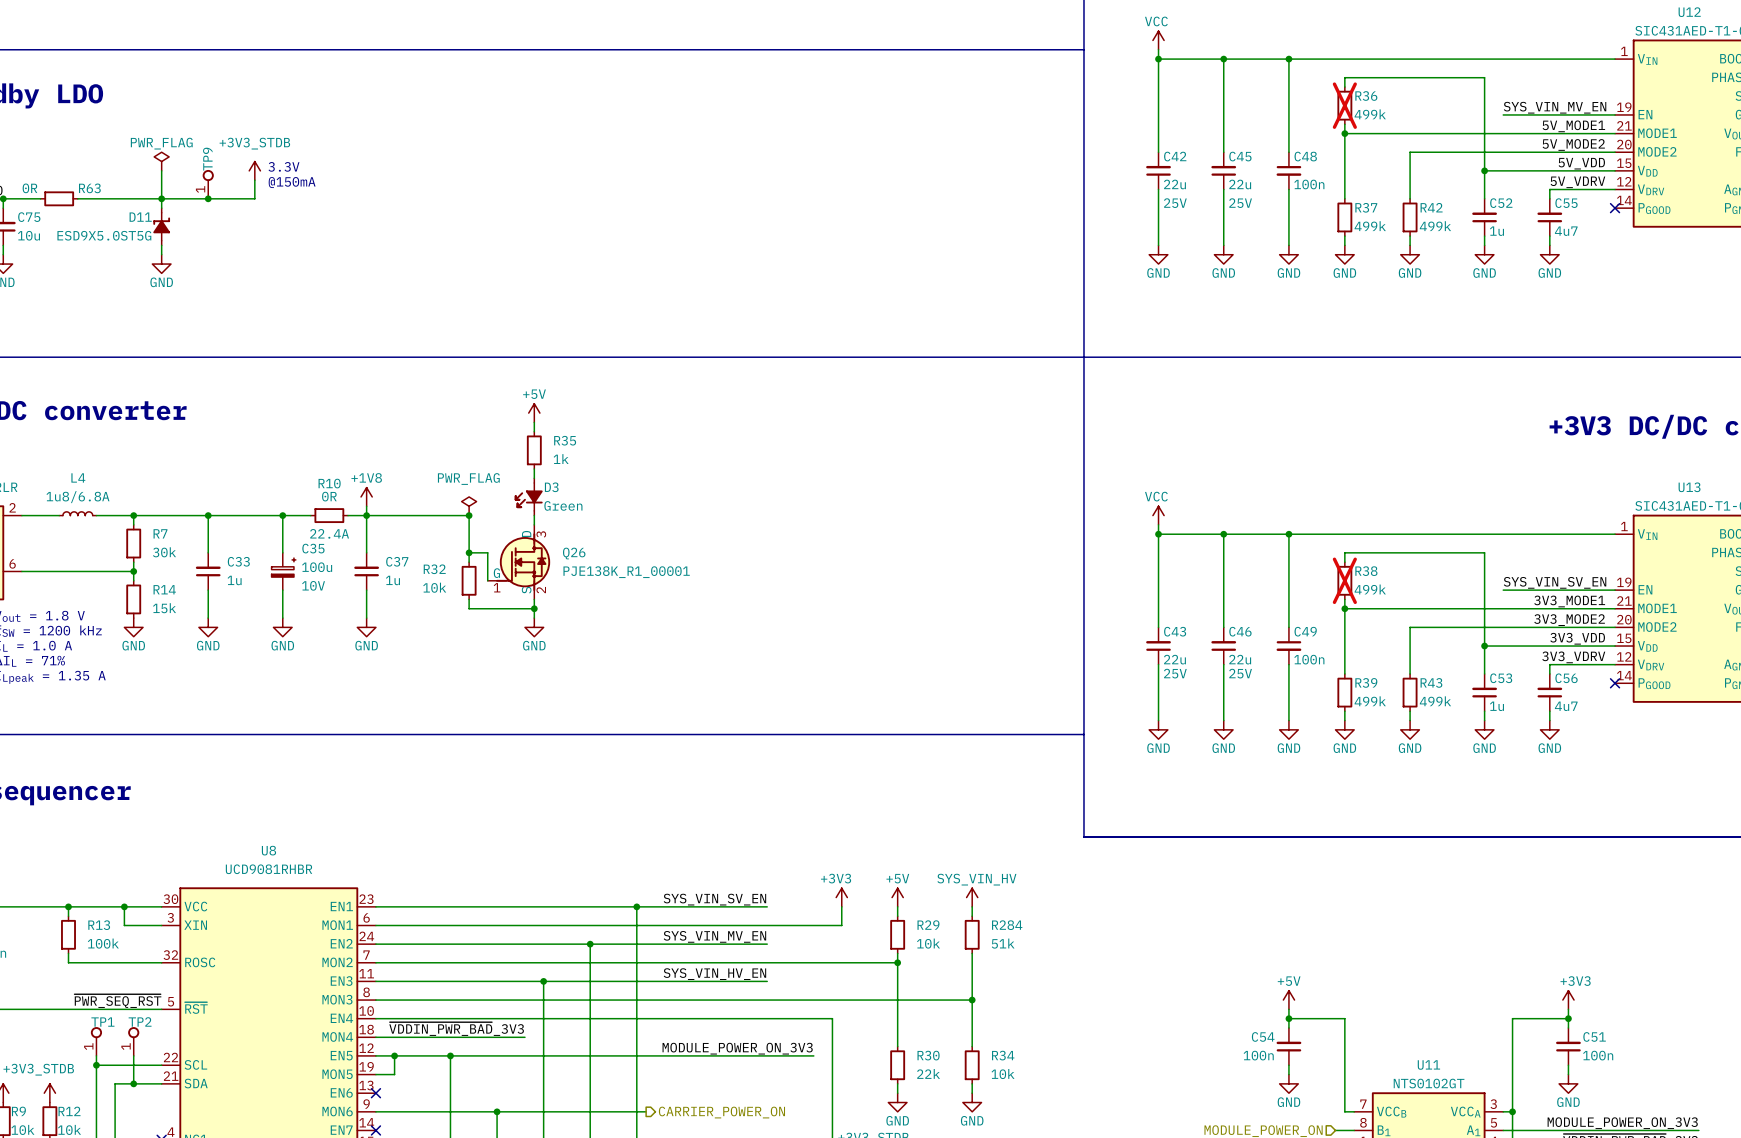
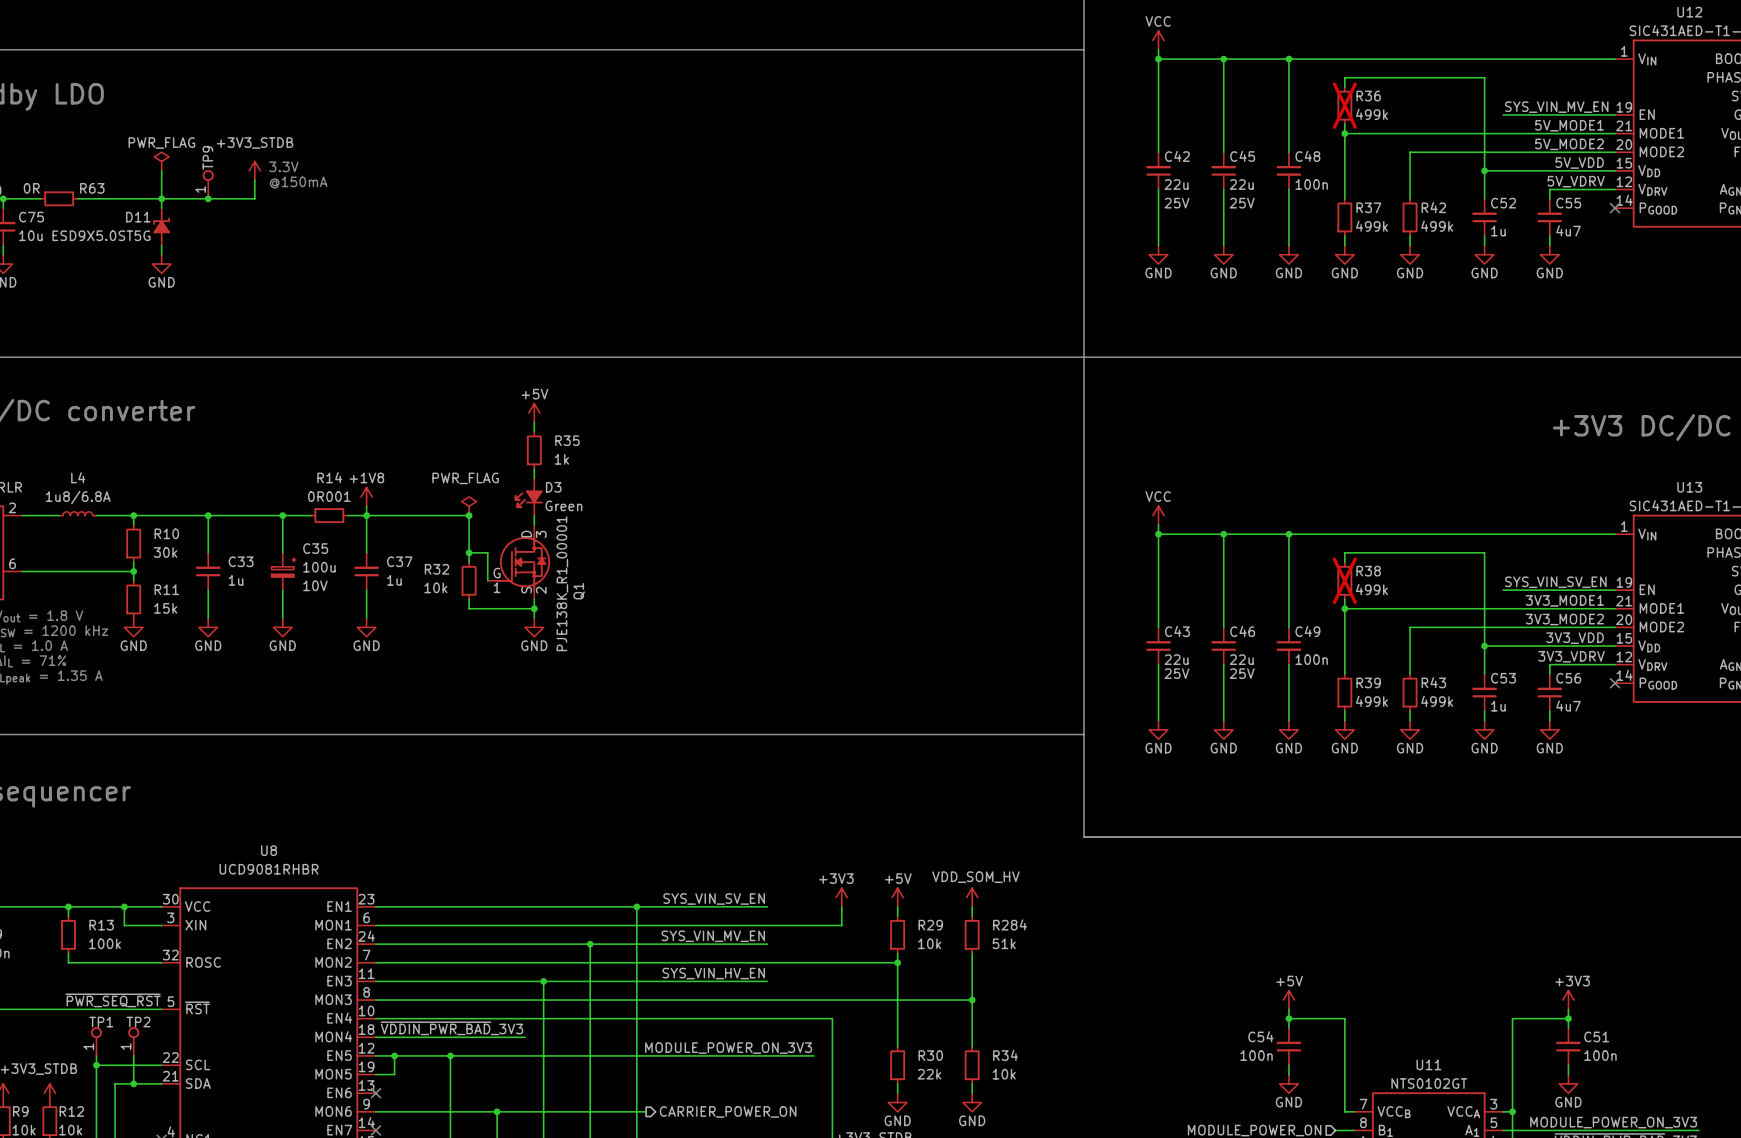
R10 name: R10 (329, 483) -> R14 (329, 477)
R10 text: 0R (329, 496) -> 0R001 (329, 496)
R7 name: R7 (160, 533) -> R10 (166, 533)
R10 text: 22.4A (329, 533) -> none
Q26 name: Q26 (574, 553) -> Q1 (579, 591)
Q26 text rotation: 0° (626, 572) -> 90° counterclockwise (562, 583)
R14 name: R14 (164, 589) -> R11 (166, 589)
power symbol: SYS_VIN_HV (972, 897) -> VDD_SOM_HV (972, 897)

